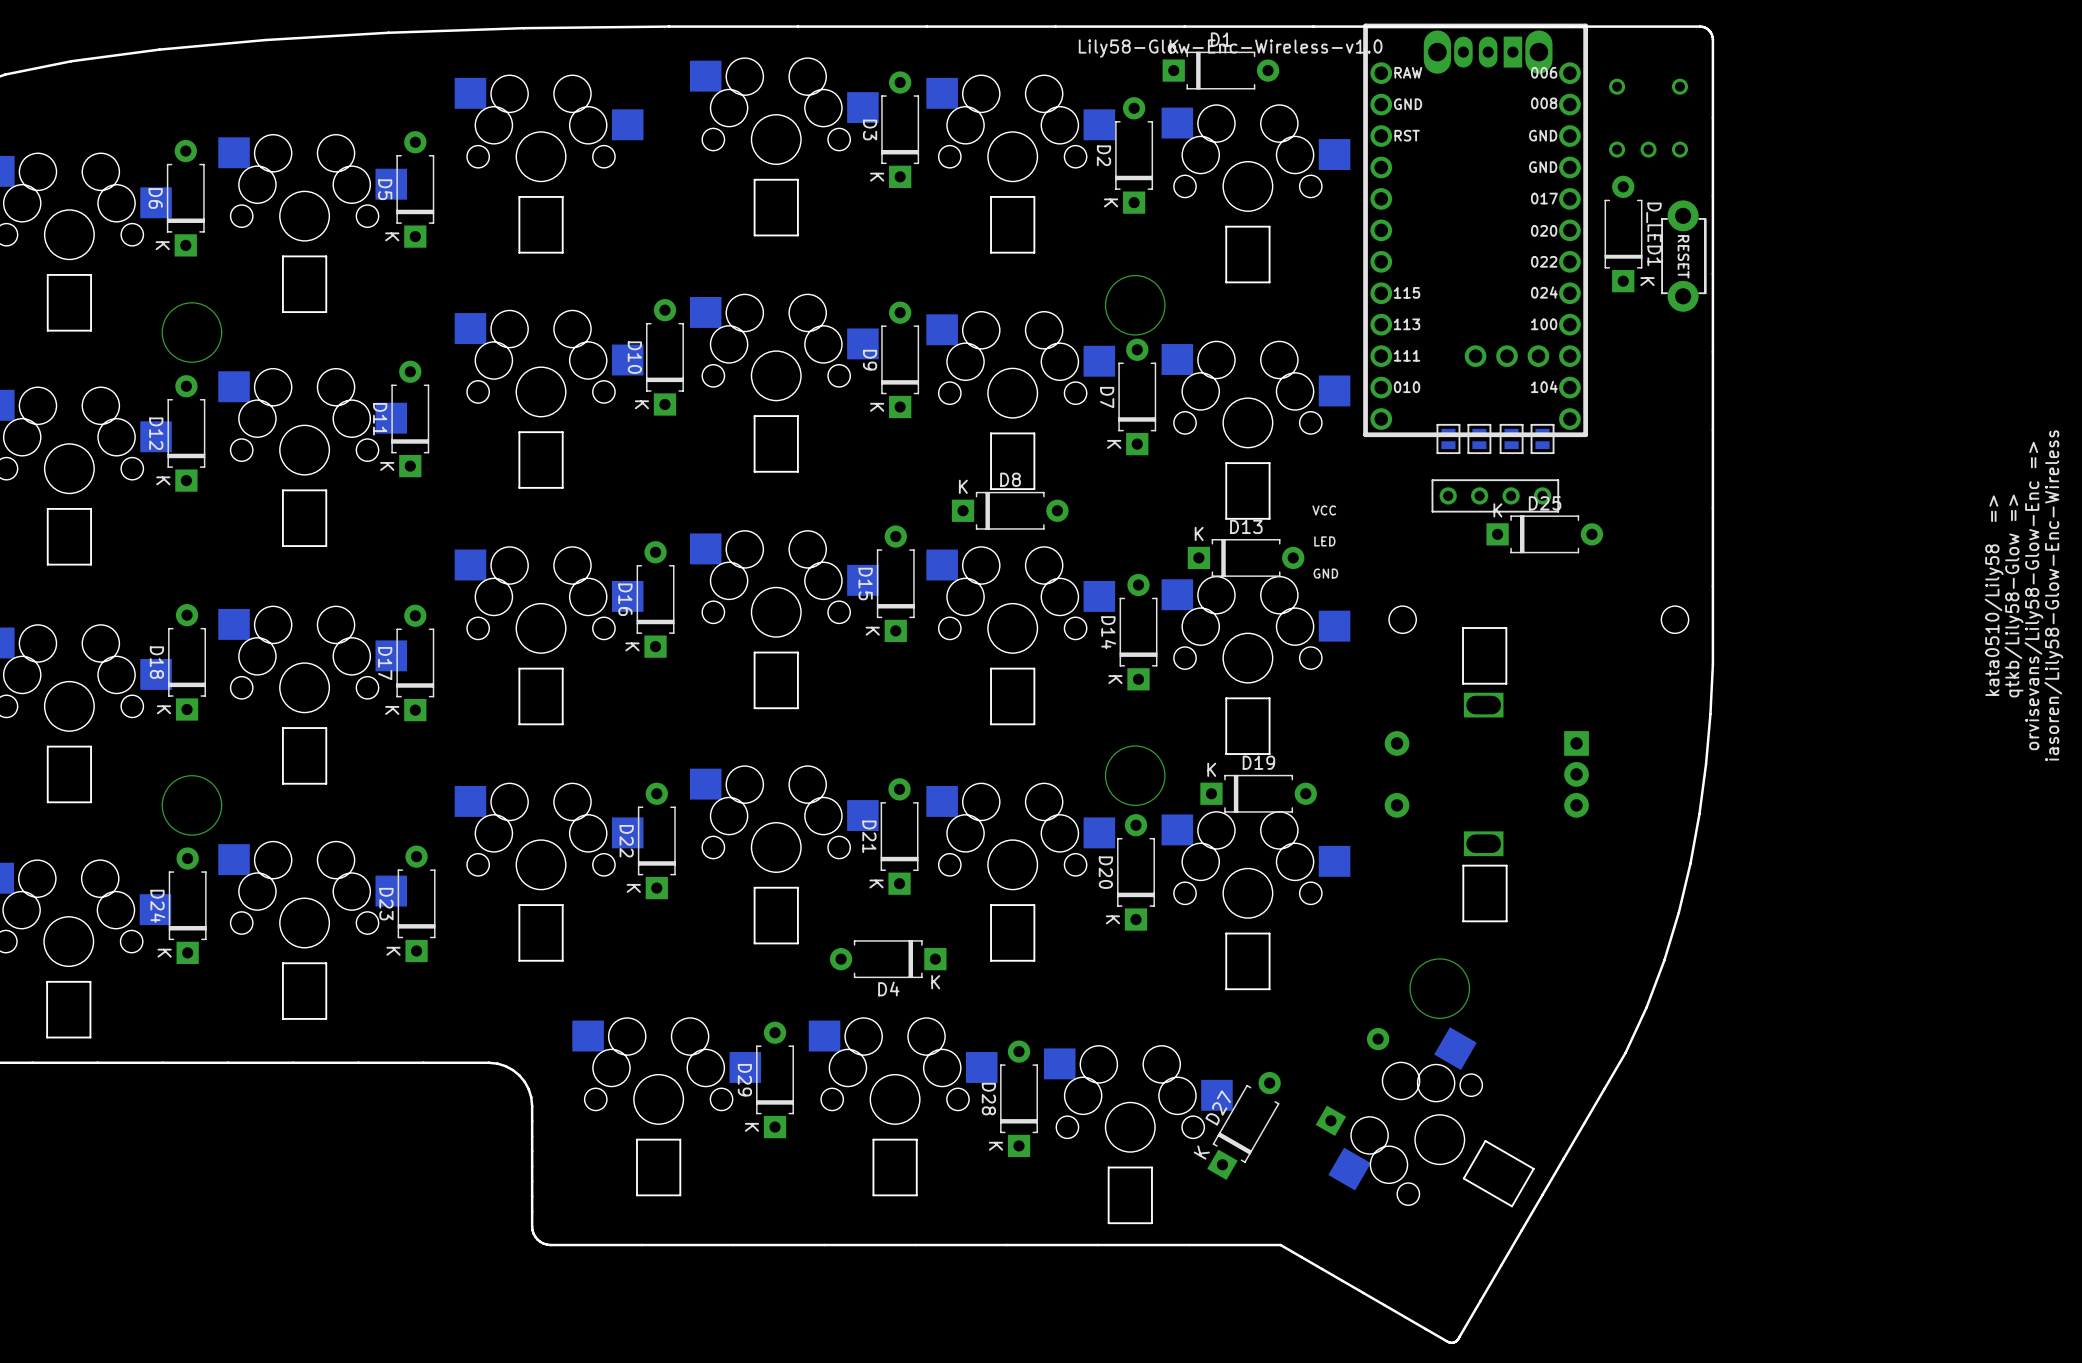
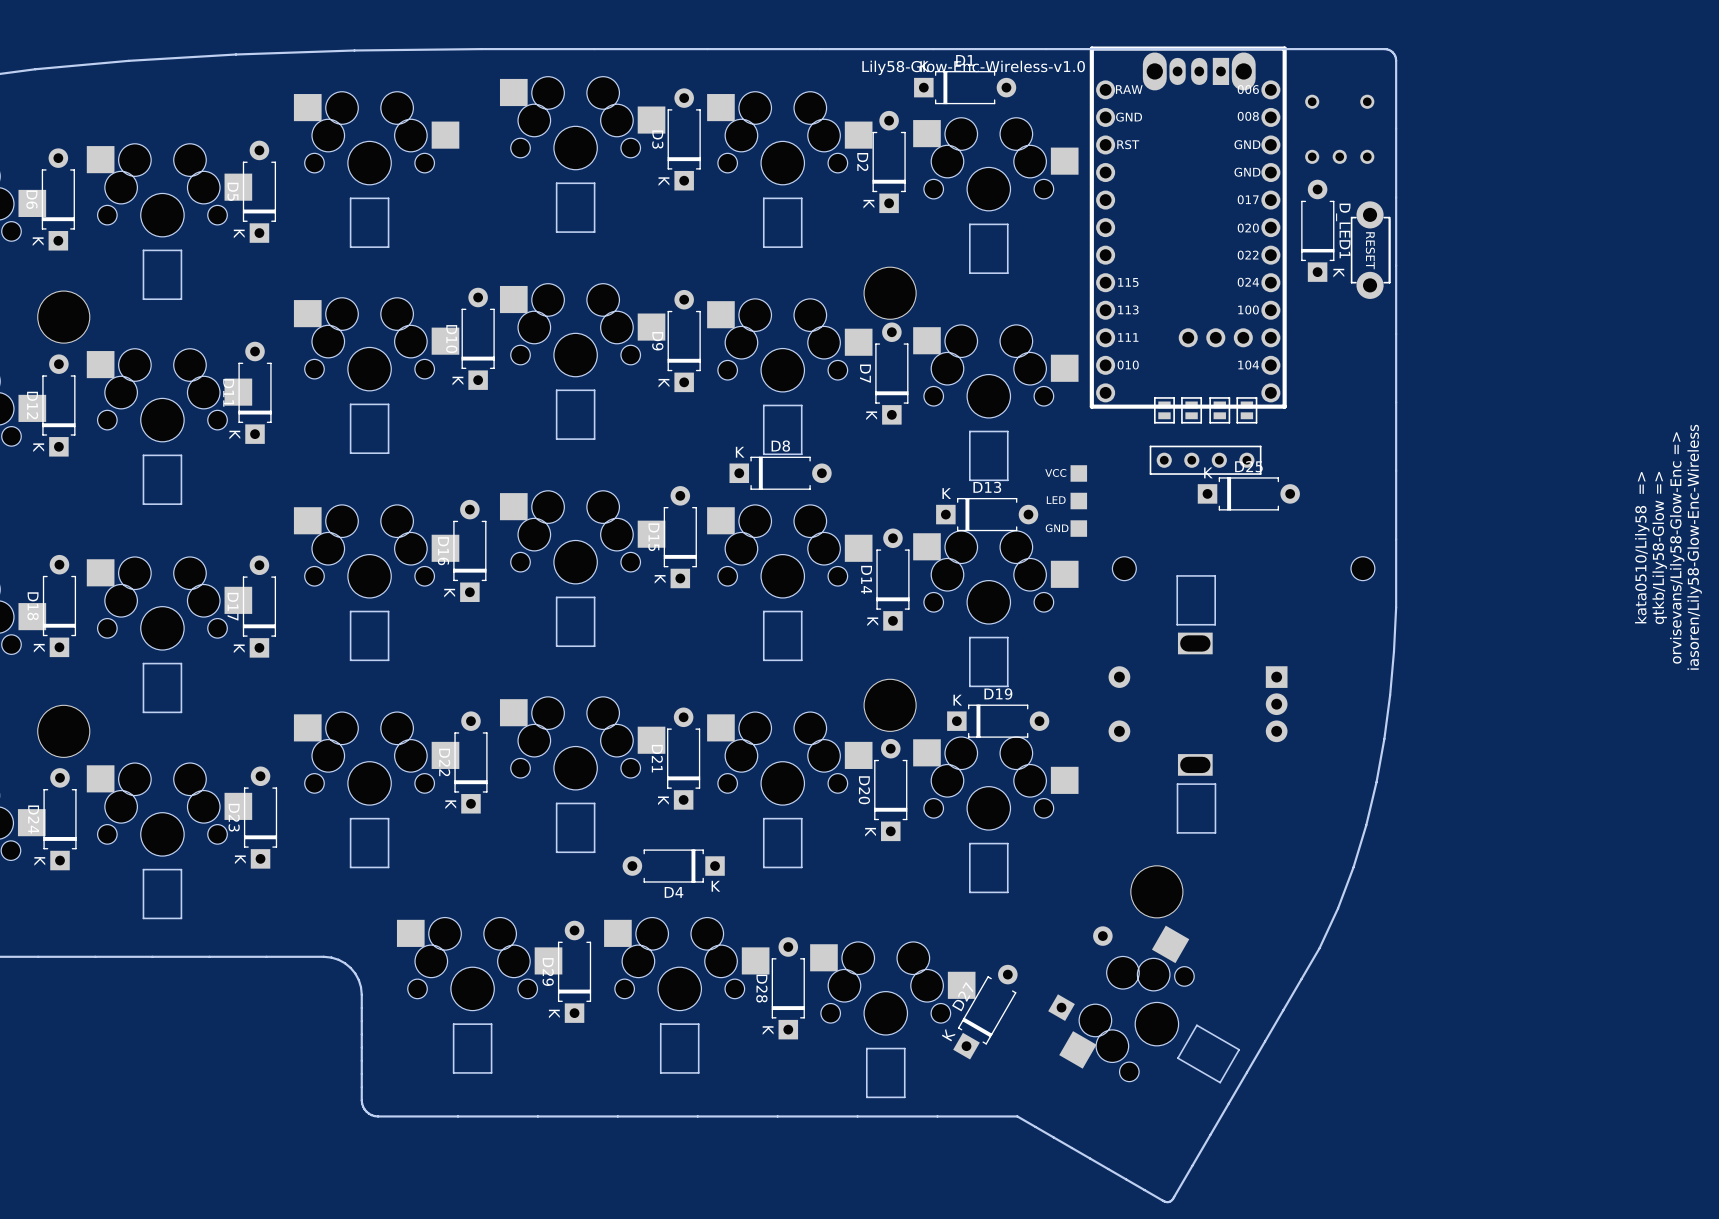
part: none -> (1078, 501)

